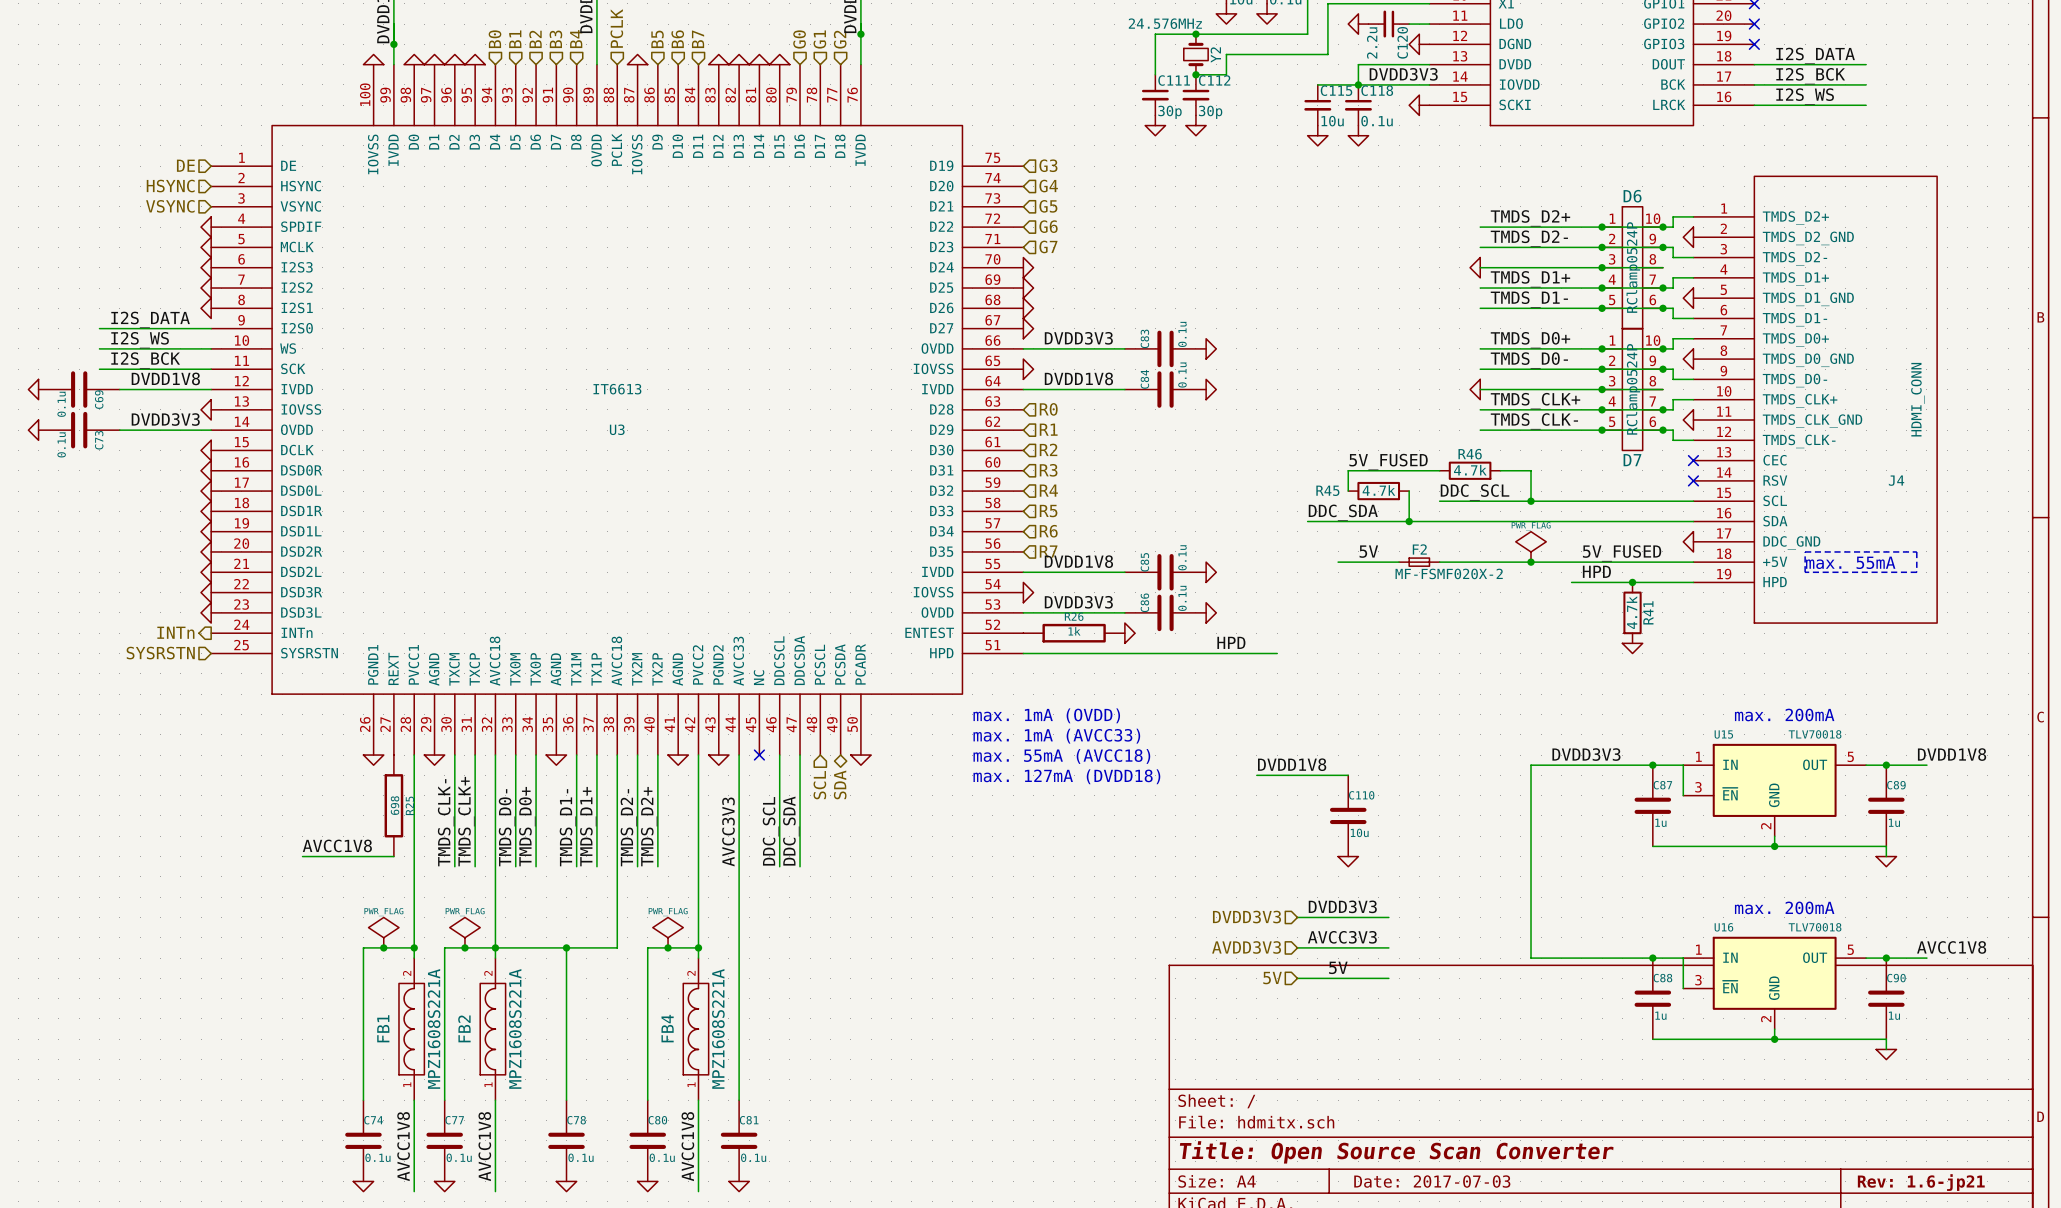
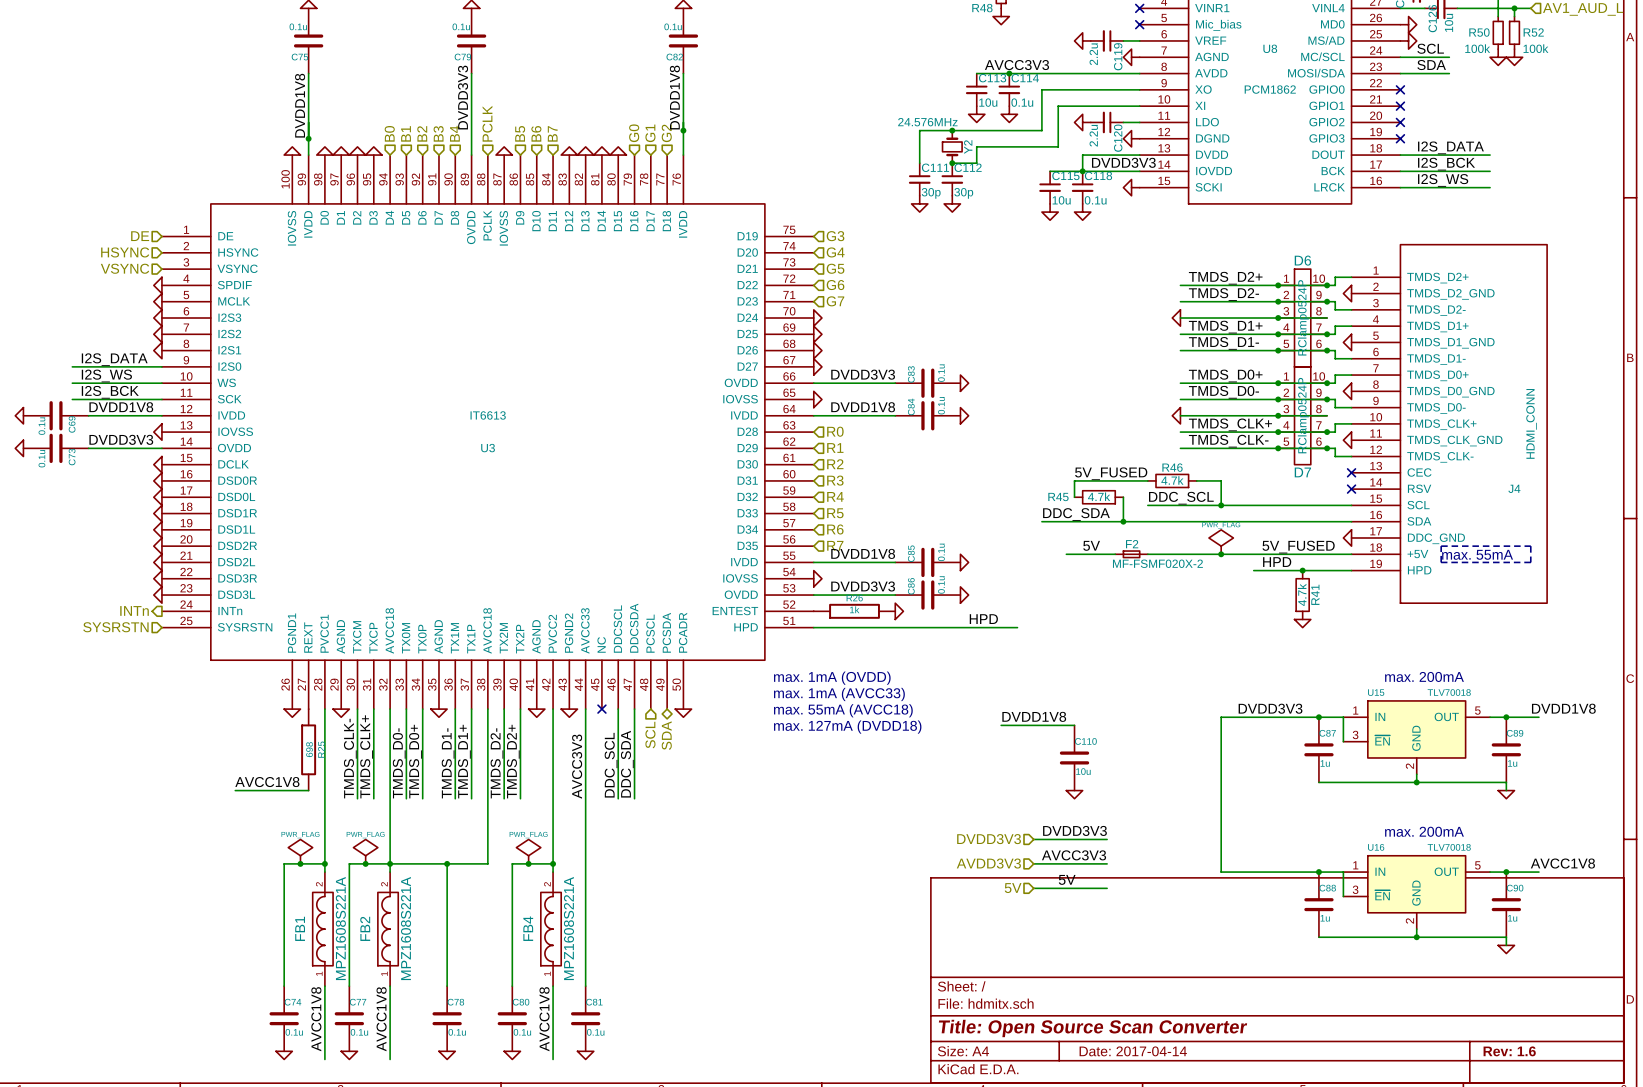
title block: Date: 2017-07-03 (1432, 1181) -> Date: 2017-04-14 (1133, 1051)
title block: Rev: 1.6-jp21 (1921, 1182) -> Rev: 1.6 (1509, 1051)

